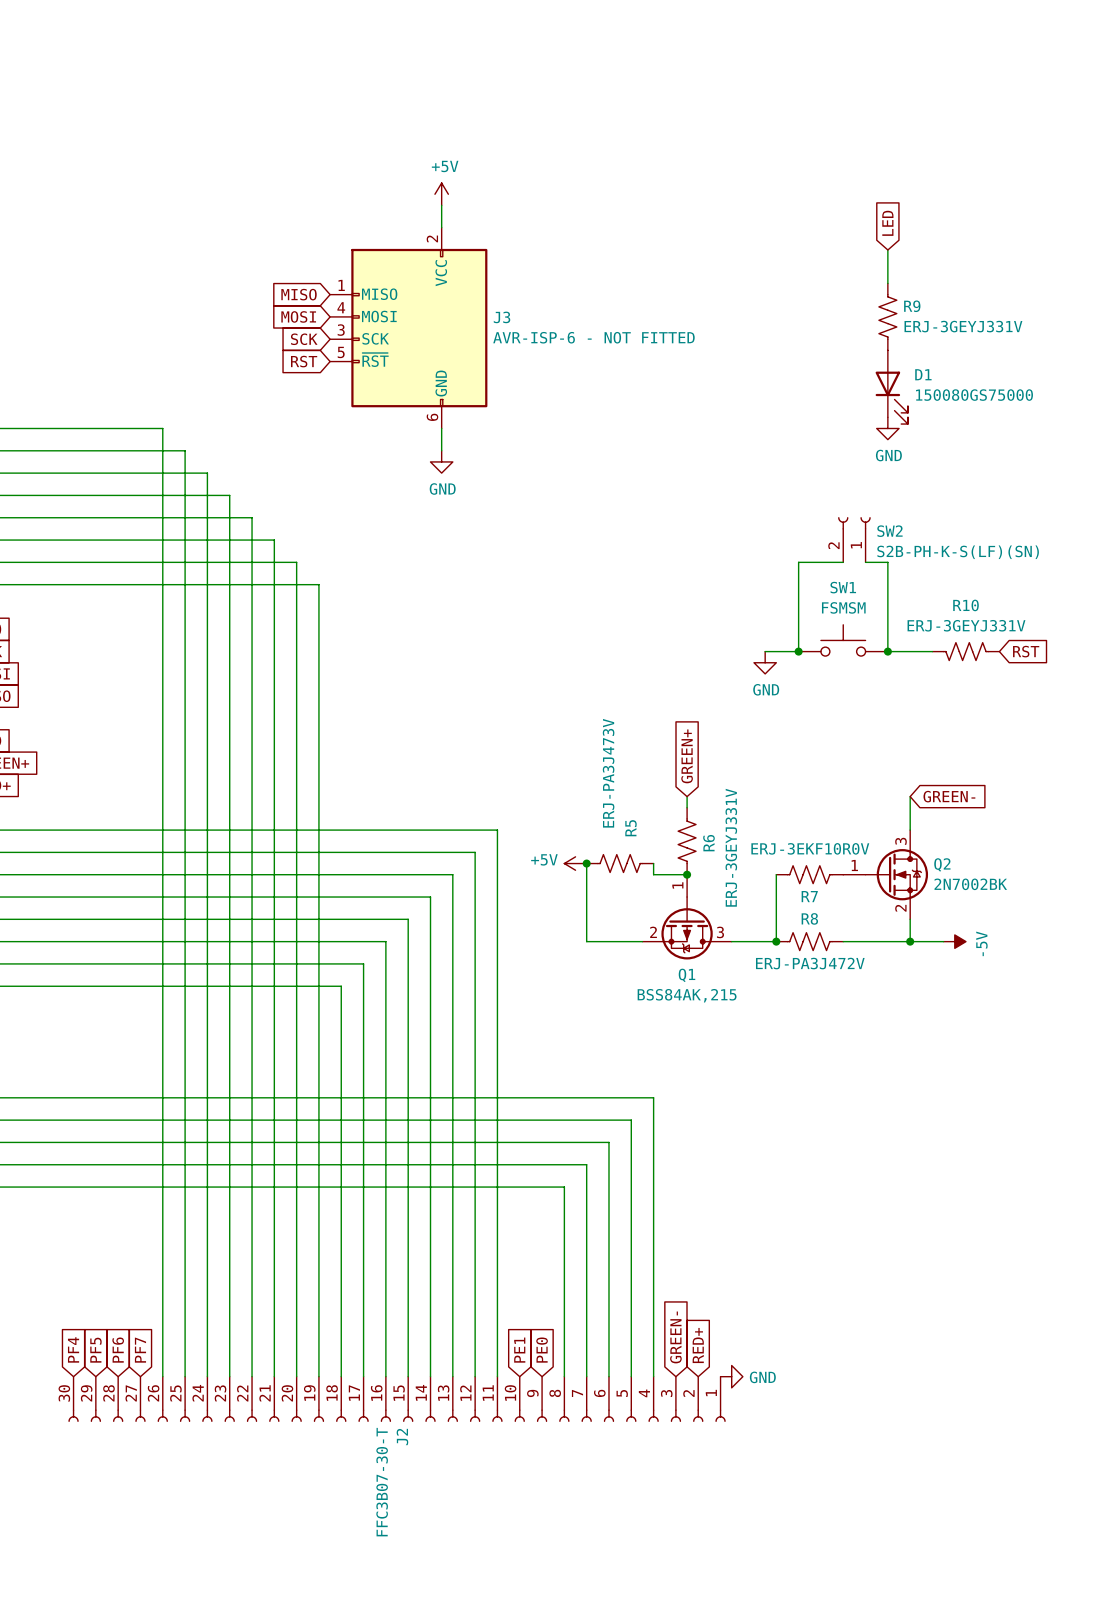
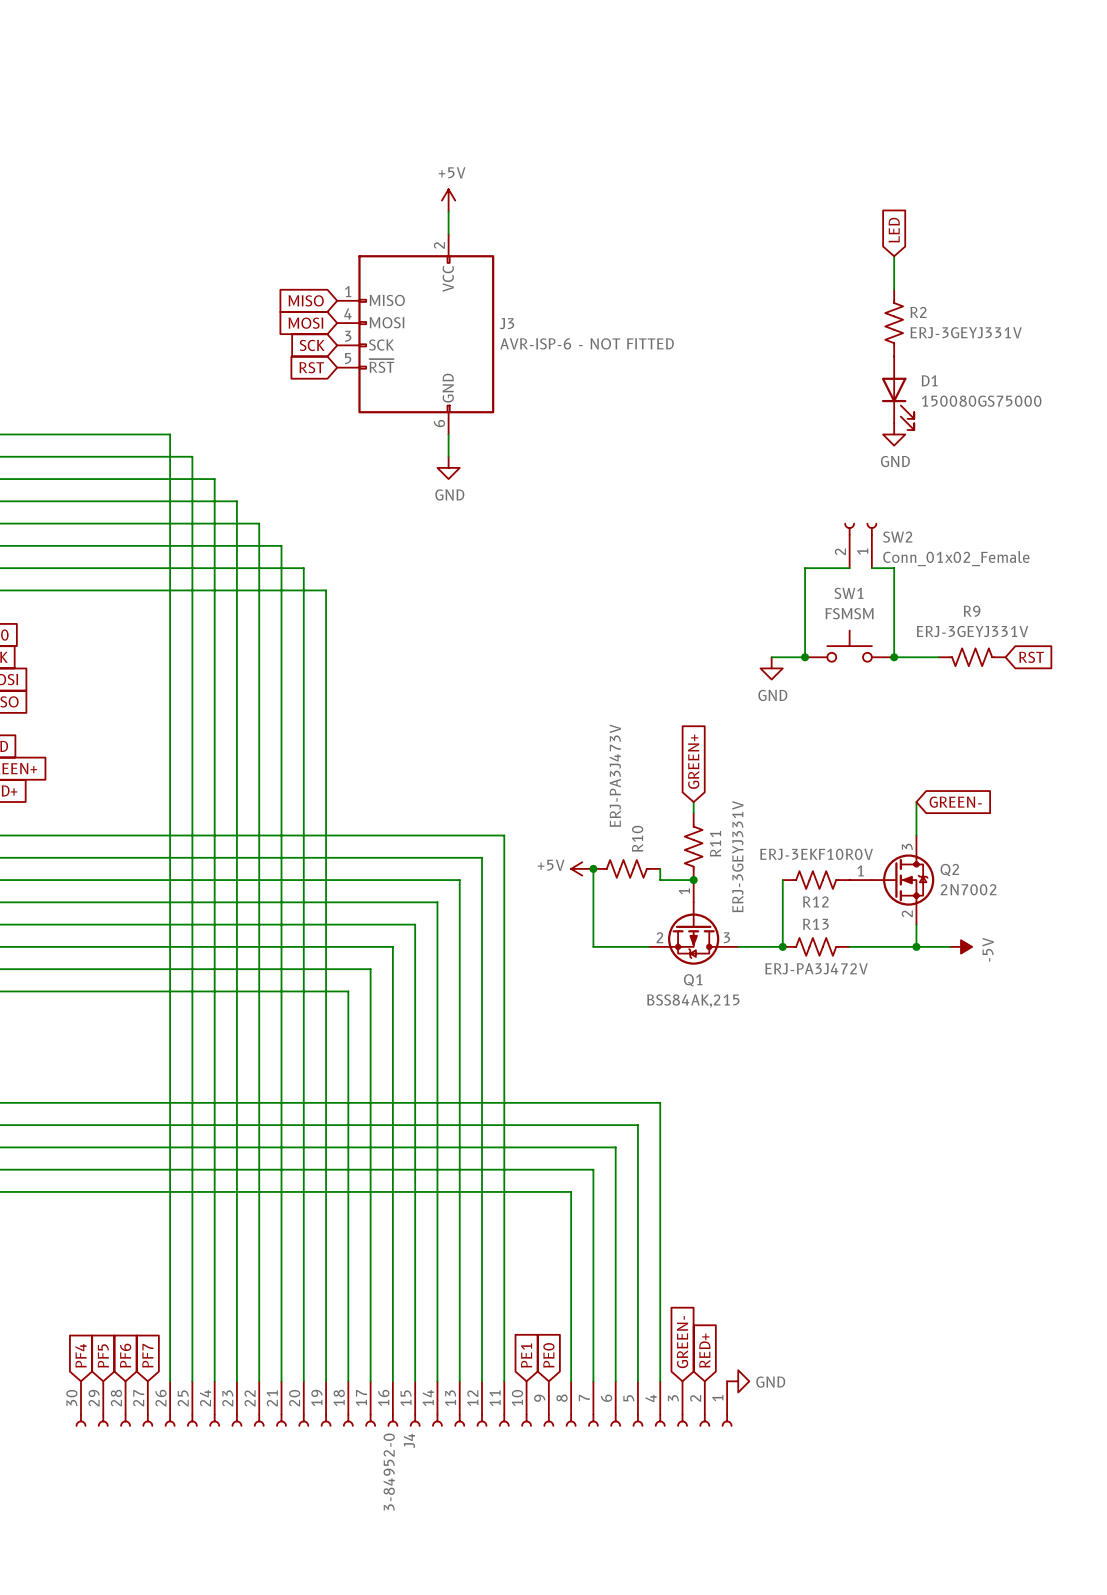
R9 name: R9 (912, 306) -> R2 (918, 312)
SW2 value: S2B-PH-K-S(LF)(SN) (958, 552) -> Conn_01x02_Female (956, 558)
R10 name: R10 (966, 605) -> R9 (972, 611)
R5 name: R5 (630, 828) -> R10 (637, 838)
R6 name: R6 (708, 843) -> R11 (715, 843)
Q2 value: 2N7002BK (970, 884) -> 2N7002 (968, 889)
R7 name: R7 (809, 896) -> R12 (815, 901)
R8 name: R8 (809, 918) -> R13 (815, 924)
J2 name: J2 (402, 1437) -> J4 (409, 1440)
J2 value: FFC3B07-30-T (382, 1482) -> 3-84952-0 (389, 1472)

